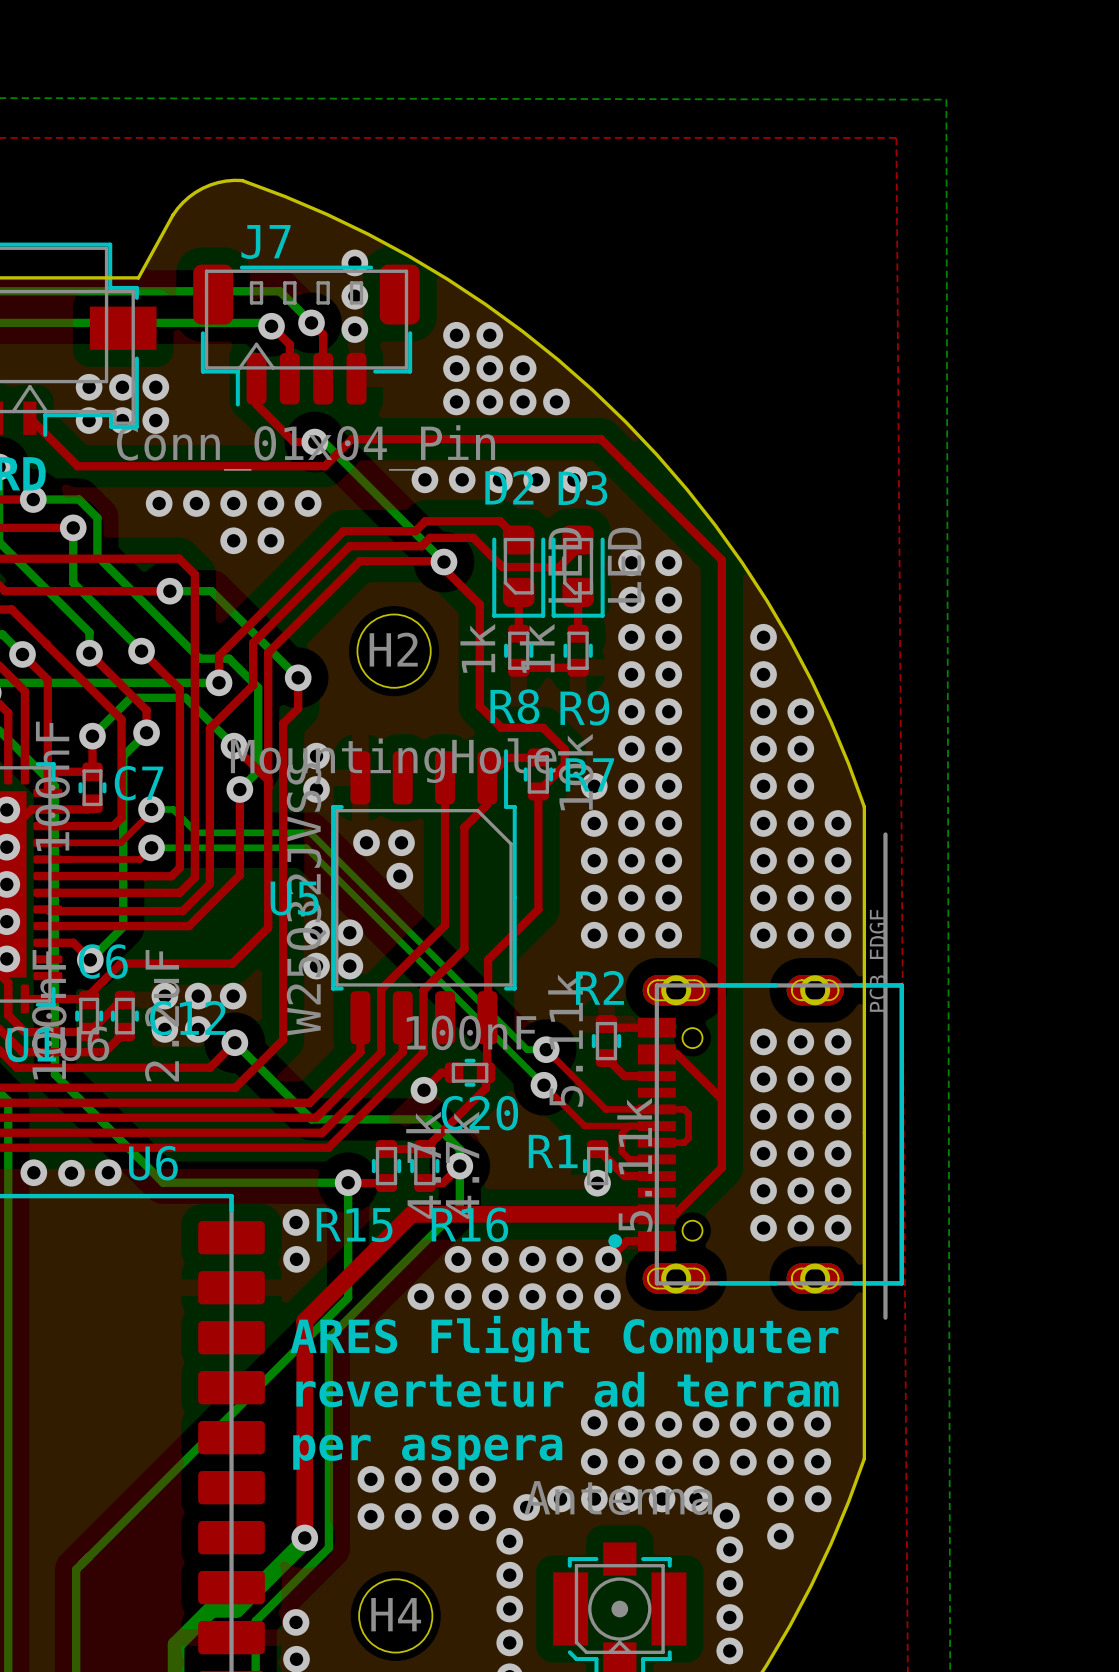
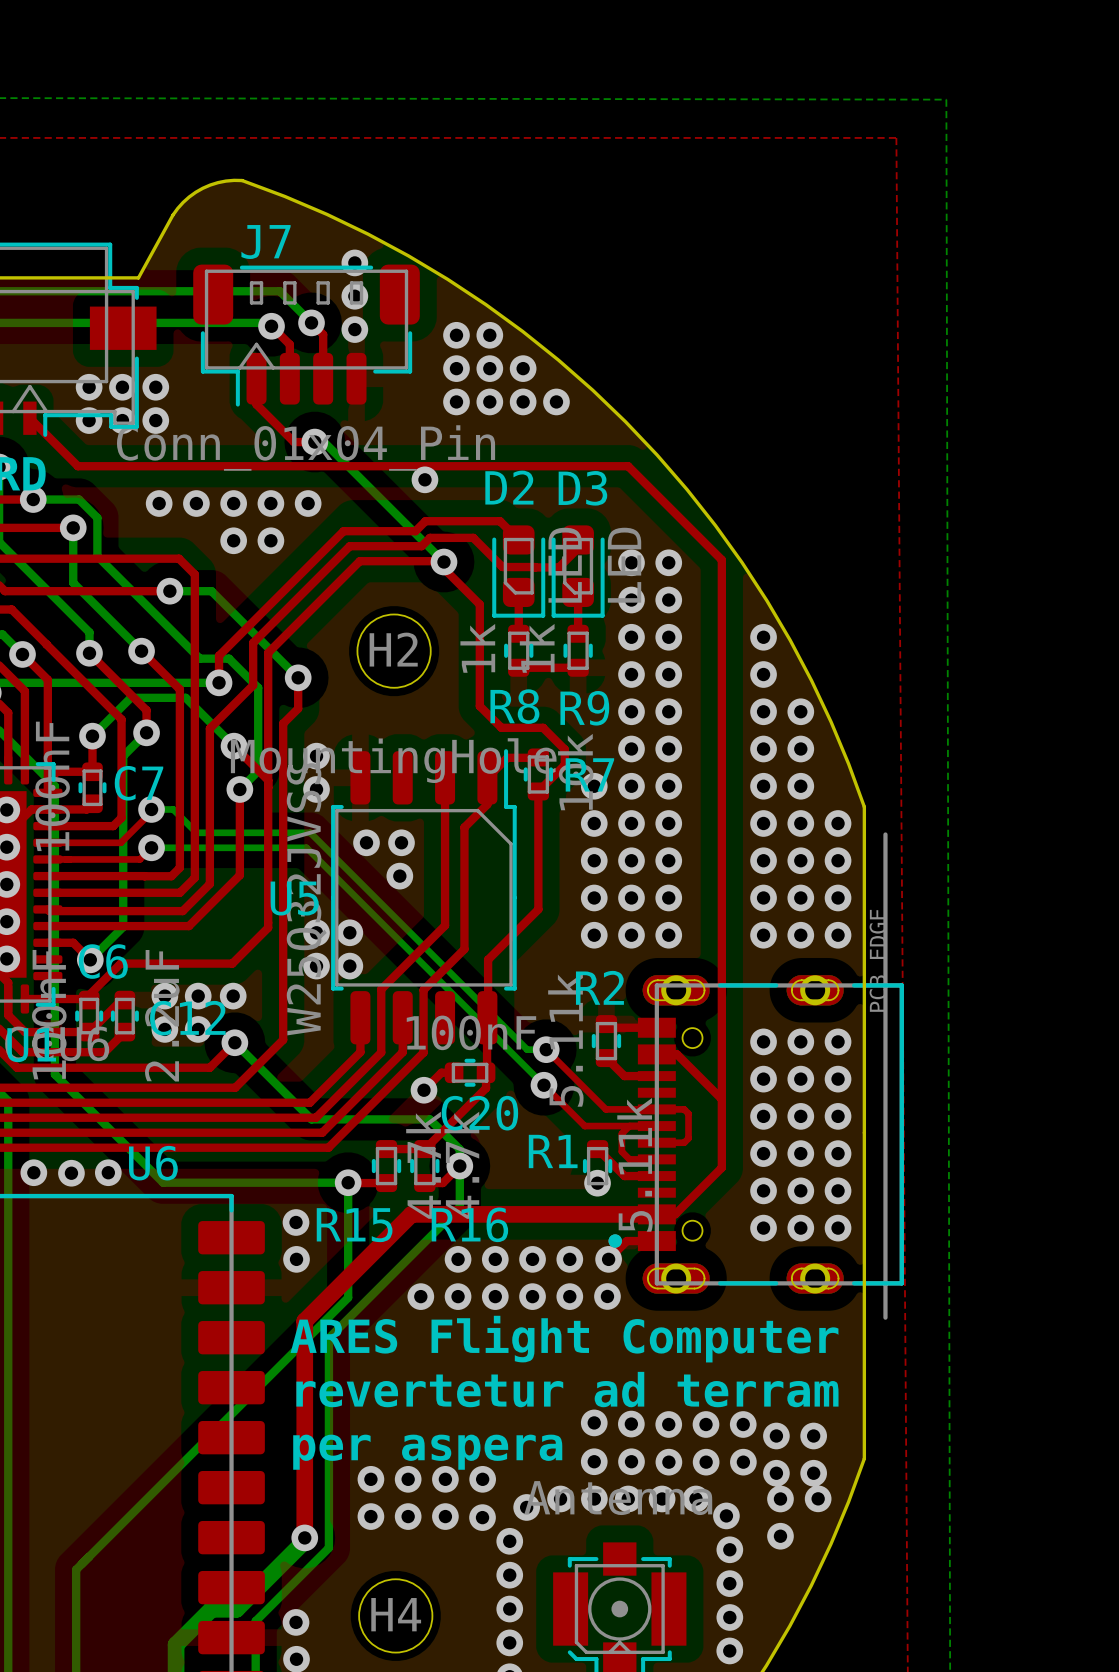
top track: (324, 466) (351, 439) (601, 439) (628, 466) -> (324, 466) (628, 466)
via: (462, 479) -> none
via: (499, 479) -> none
via: (536, 479) -> none
via: (573, 479) -> none
via position: (780, 1424) -> (776, 1436)
via position: (817, 1424) -> (813, 1436)
via position: (780, 1461) -> (776, 1473)
via position: (817, 1461) -> (813, 1473)

